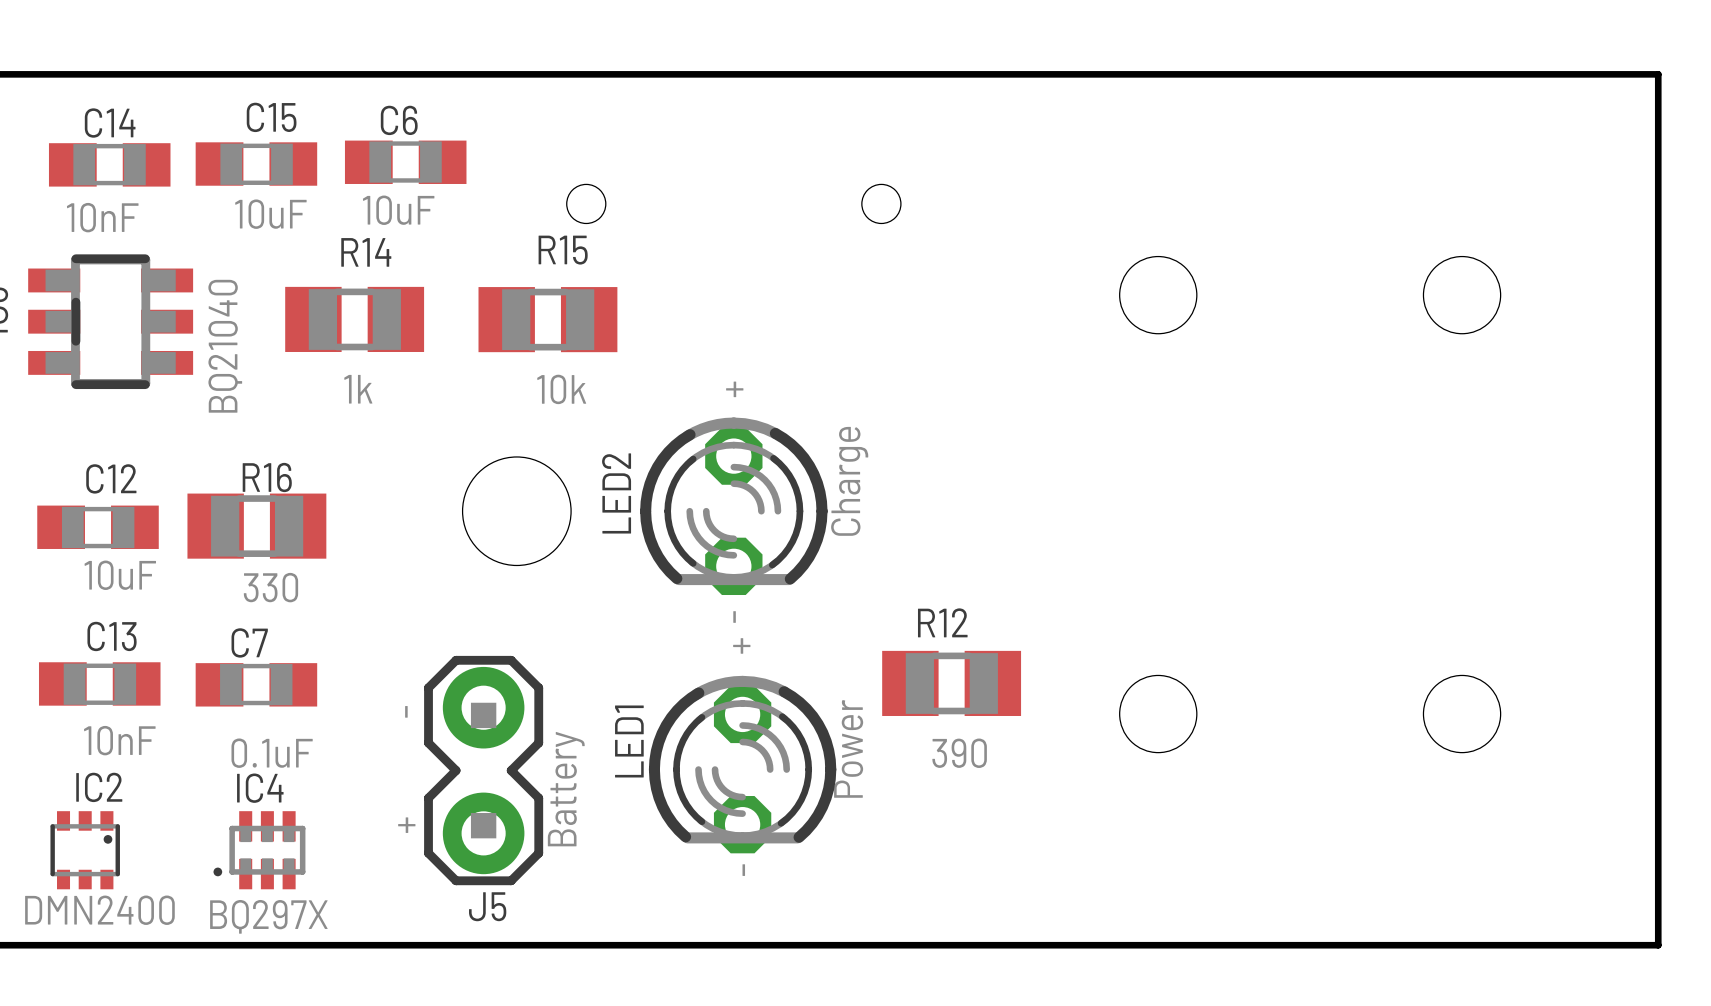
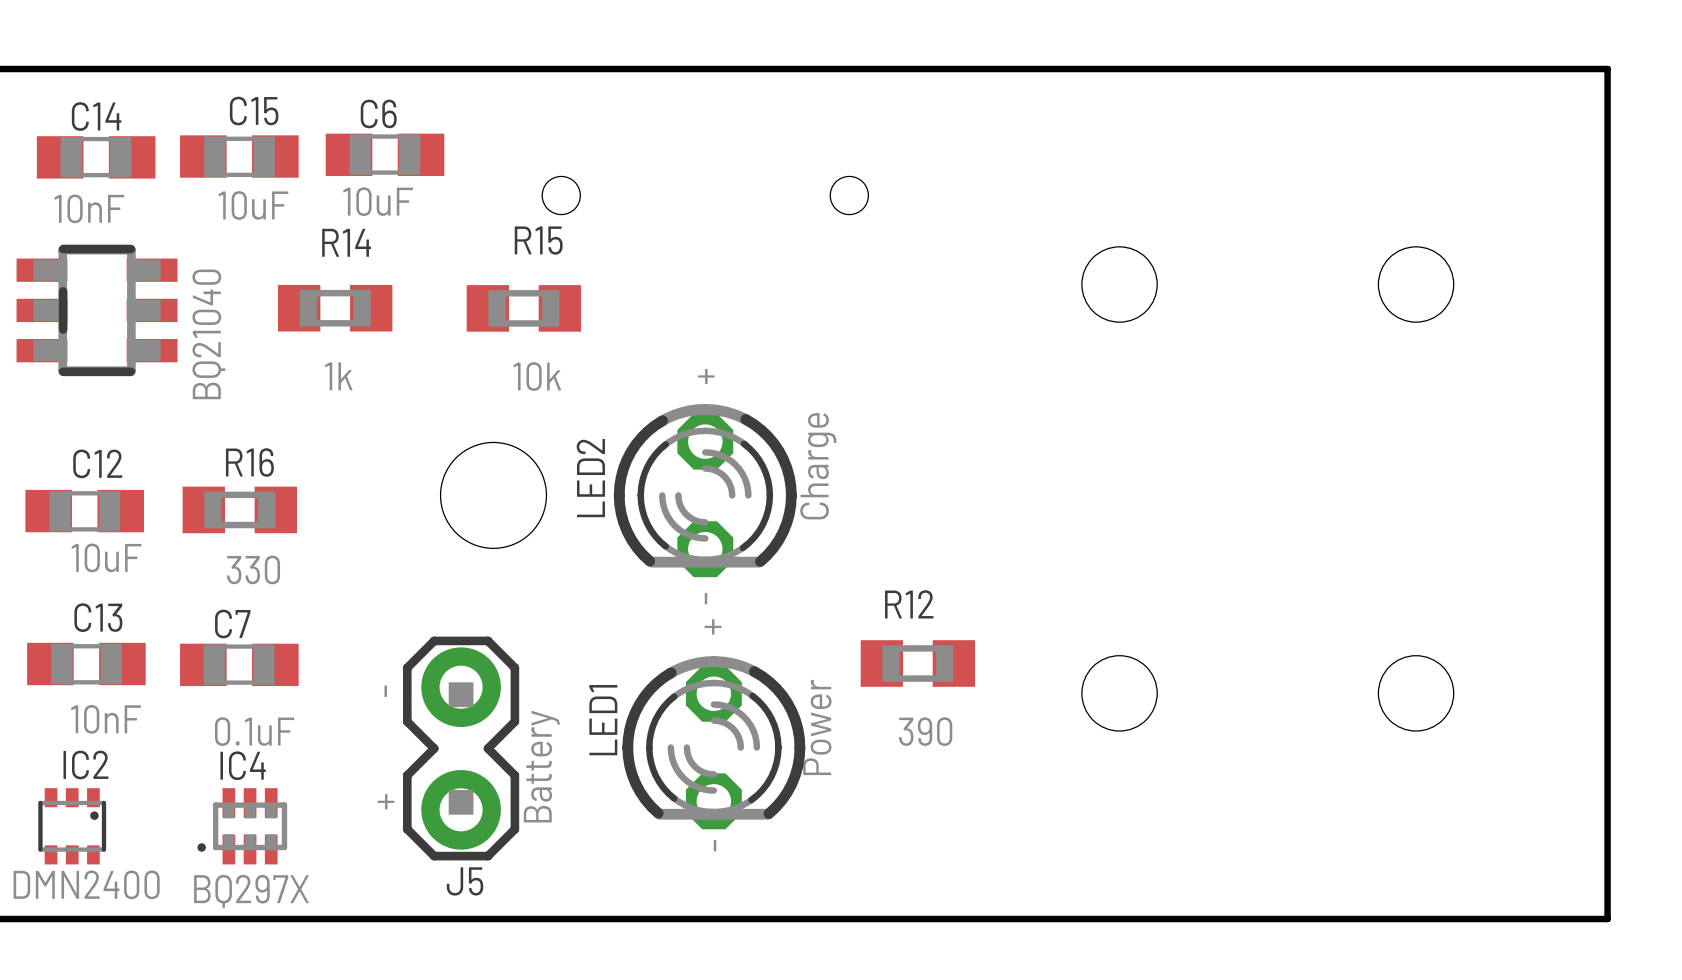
R14 footprint: [285, 286, 425, 352] -> [278, 284, 393, 332]
R15 footprint: [478, 287, 618, 353] -> [466, 285, 582, 332]
R16 footprint: [187, 493, 327, 559] -> [182, 486, 297, 534]
R12 footprint: [882, 650, 1022, 716] -> [860, 640, 976, 687]

